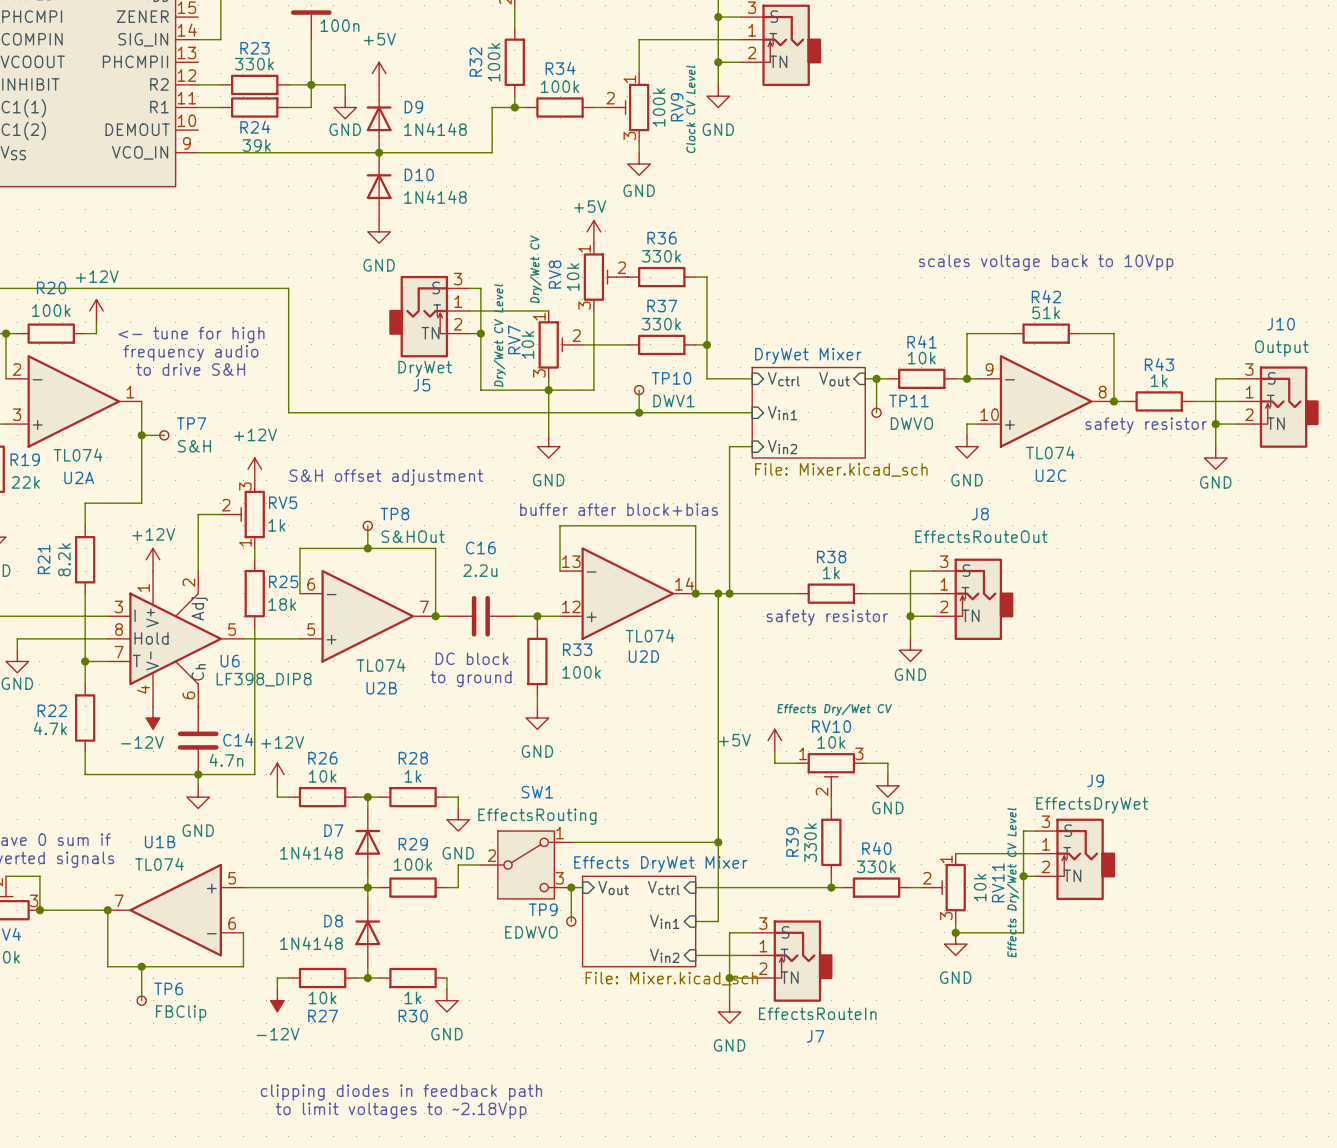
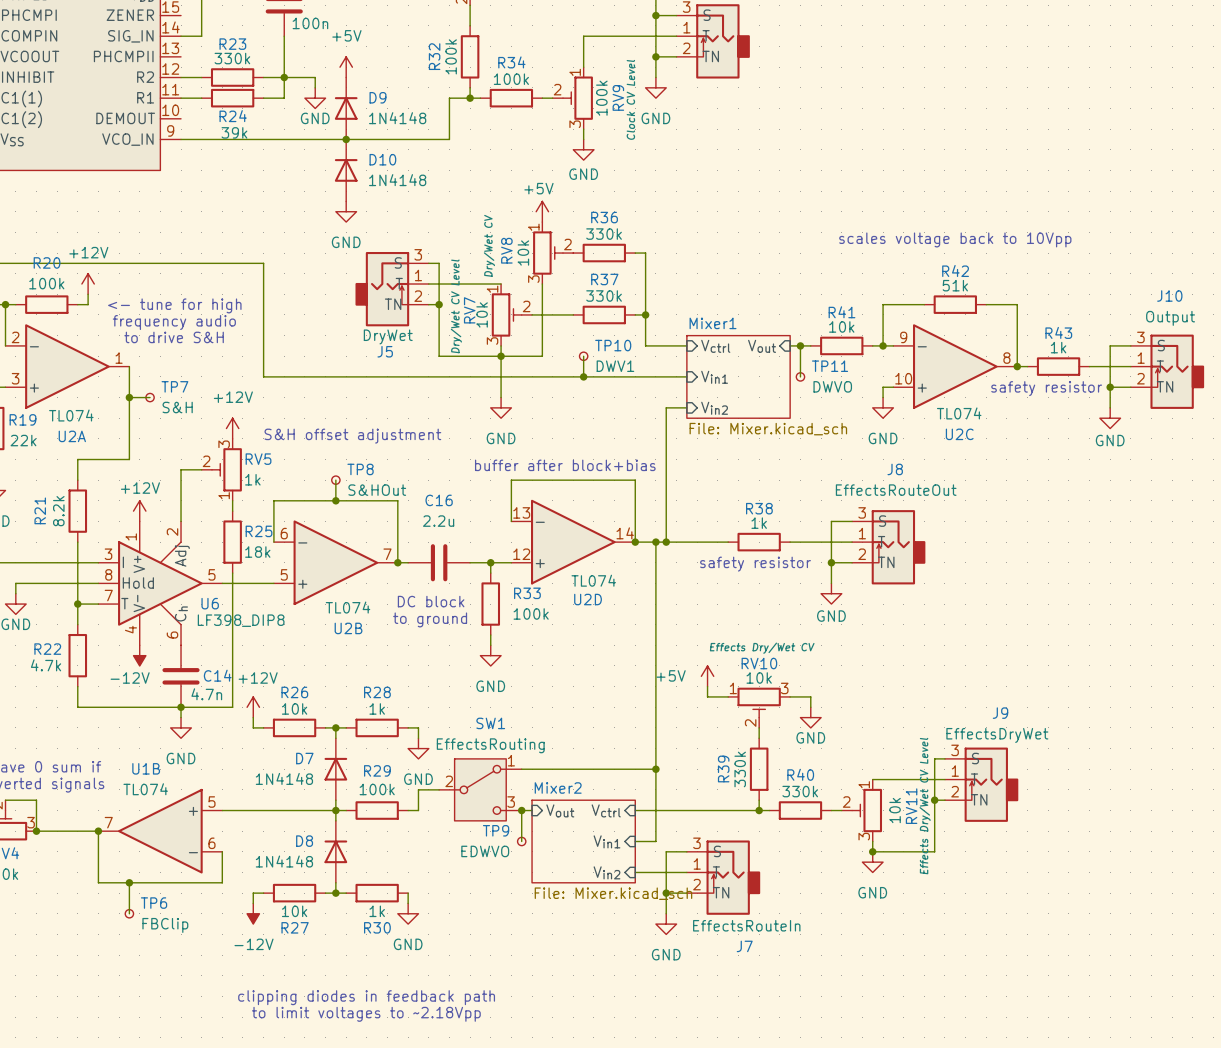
sheet DryWet Mixer name: DryWet Mixer (808, 356) -> Mixer1 (713, 323)
sheet Effects DryWet Mixer name: Effects DryWet Mixer (660, 864) -> Mixer2 (558, 787)

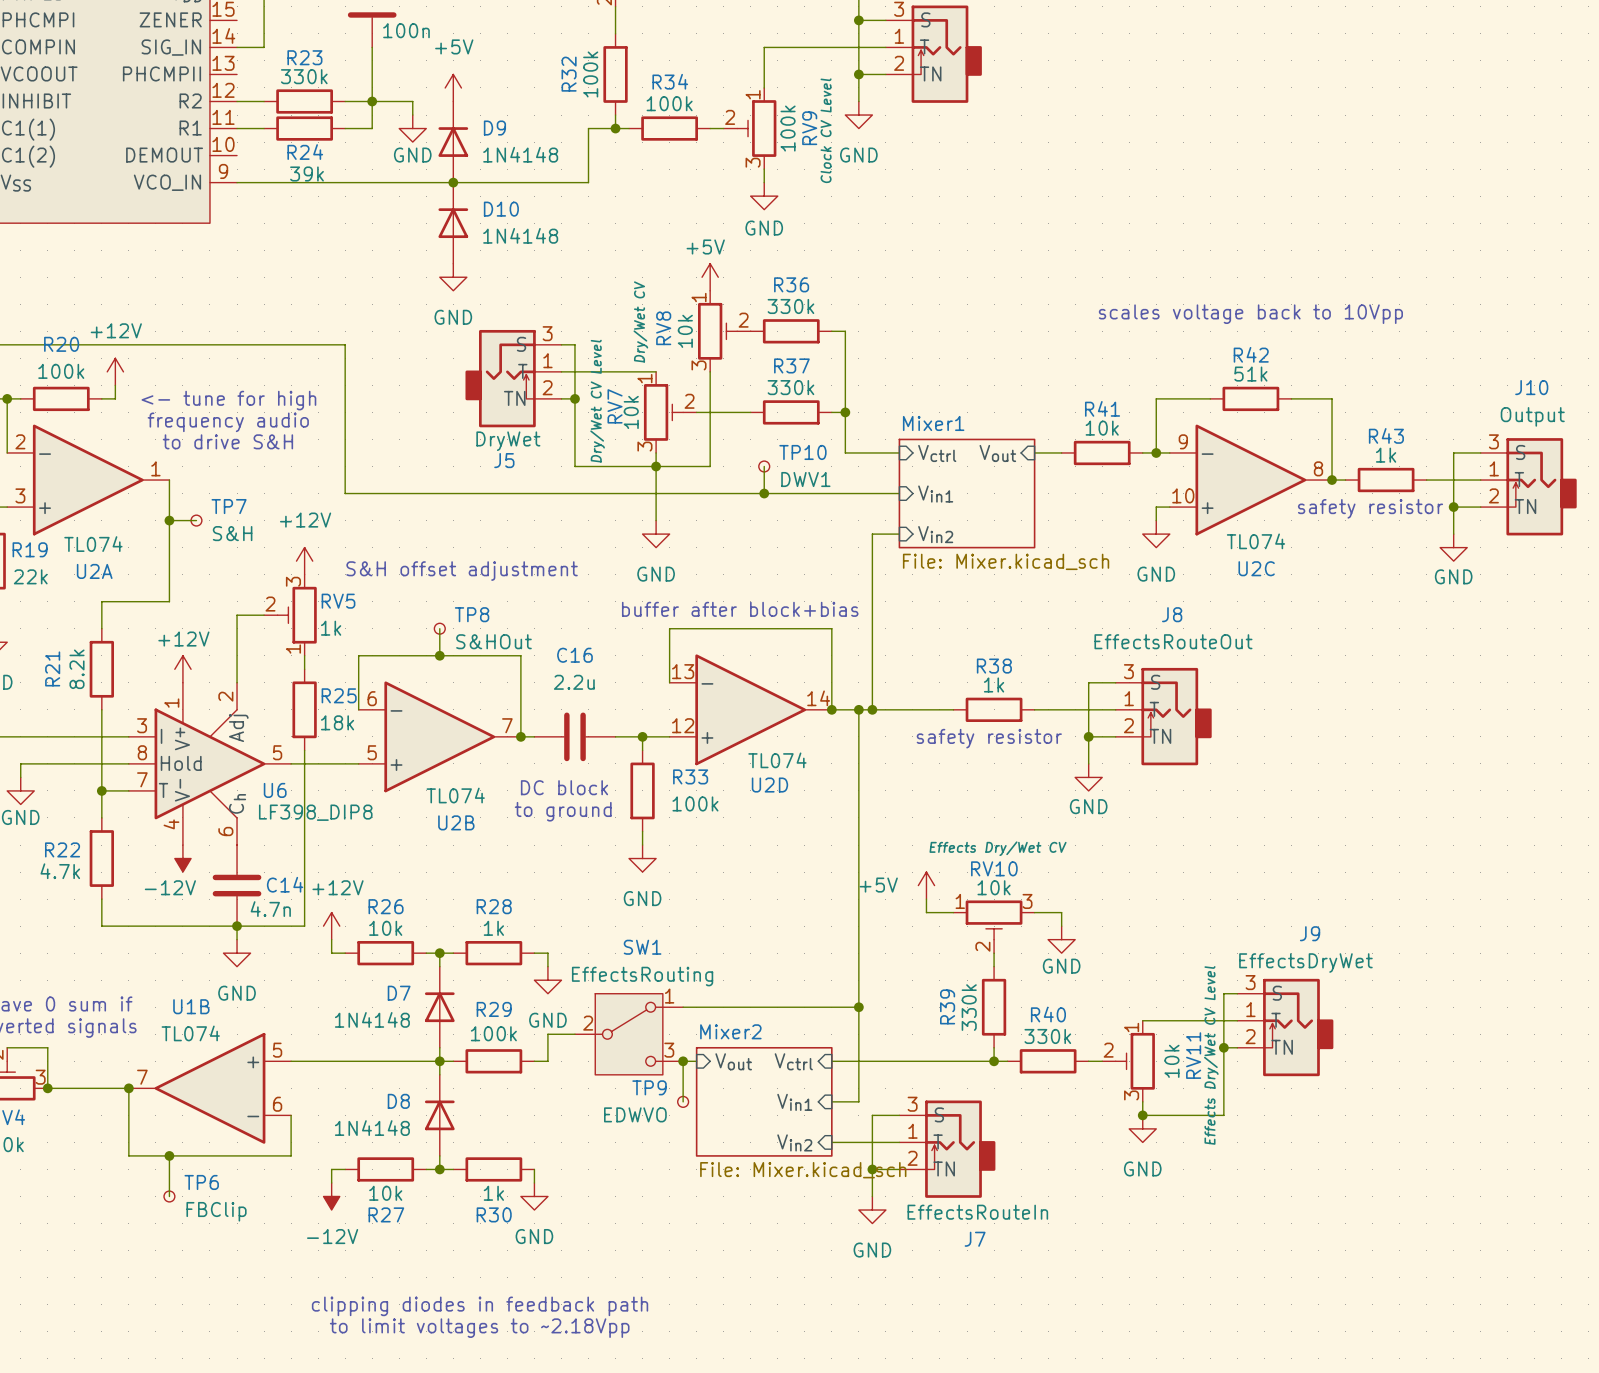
wire: (800, 345) (800, 376) -> none
junction: (800, 345) -> none
TP11: DWVO (800, 376) -> none

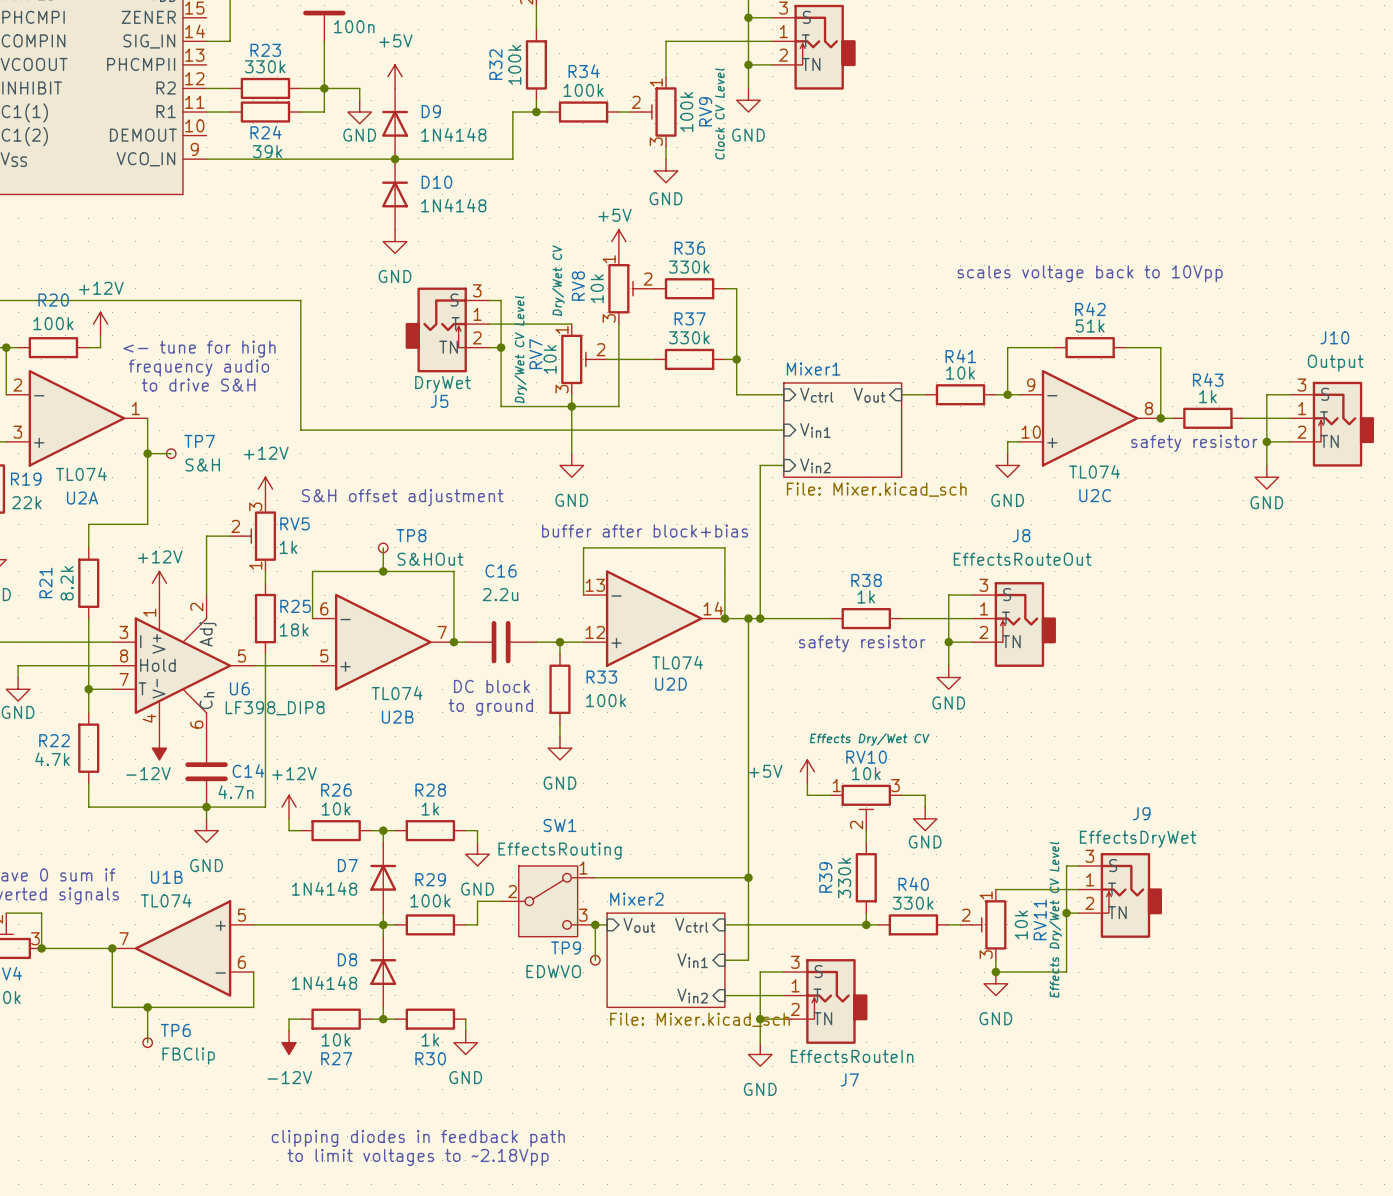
wire: (764, 466) (764, 493) -> none
TP10: DWV1 (764, 466) -> none
junction: (764, 493) -> none

